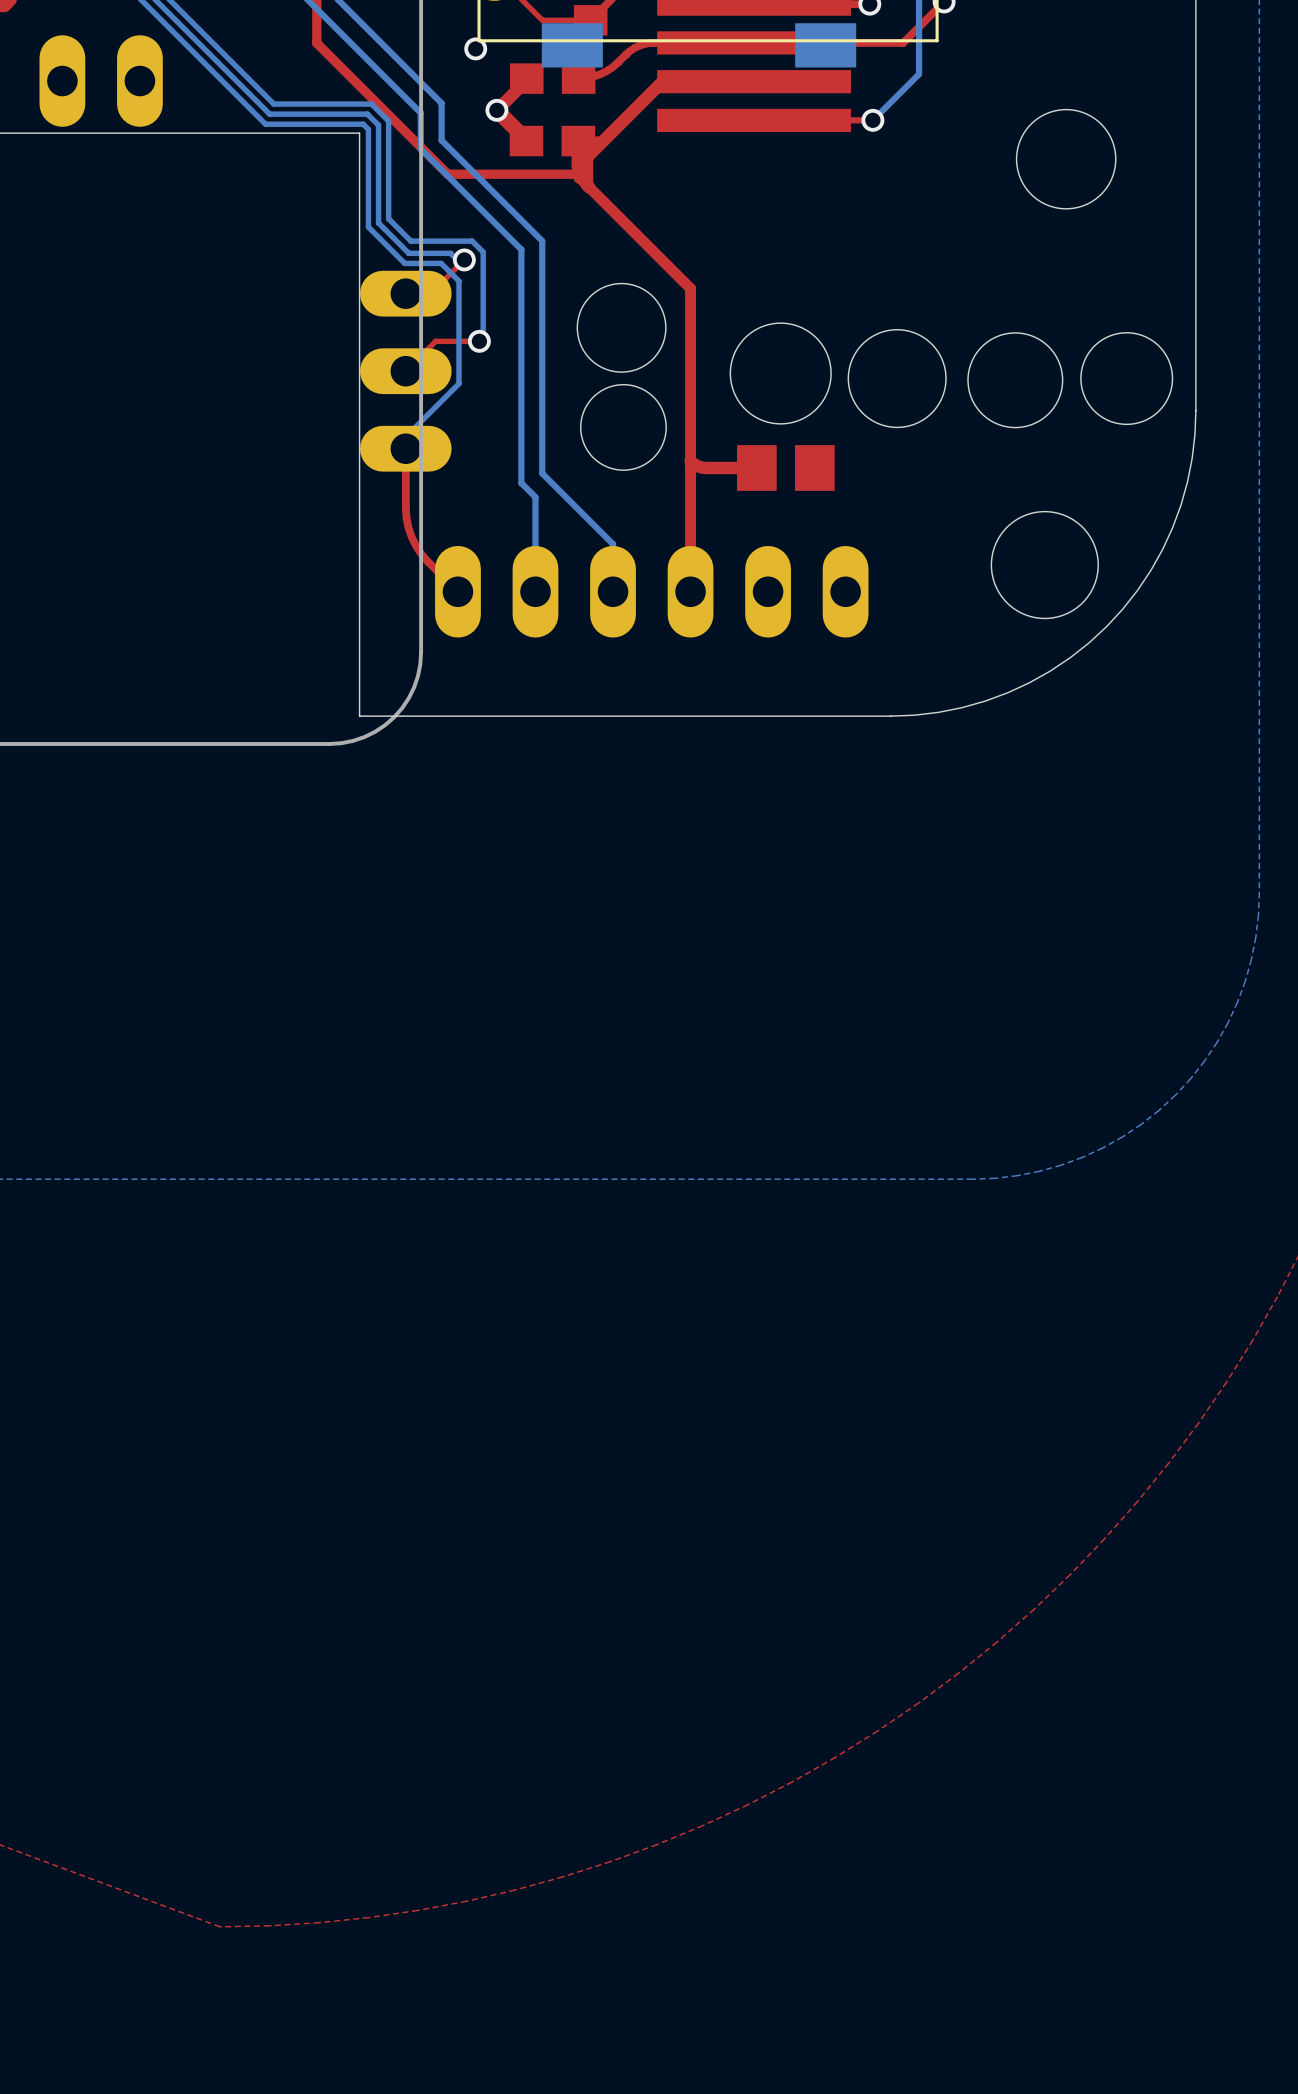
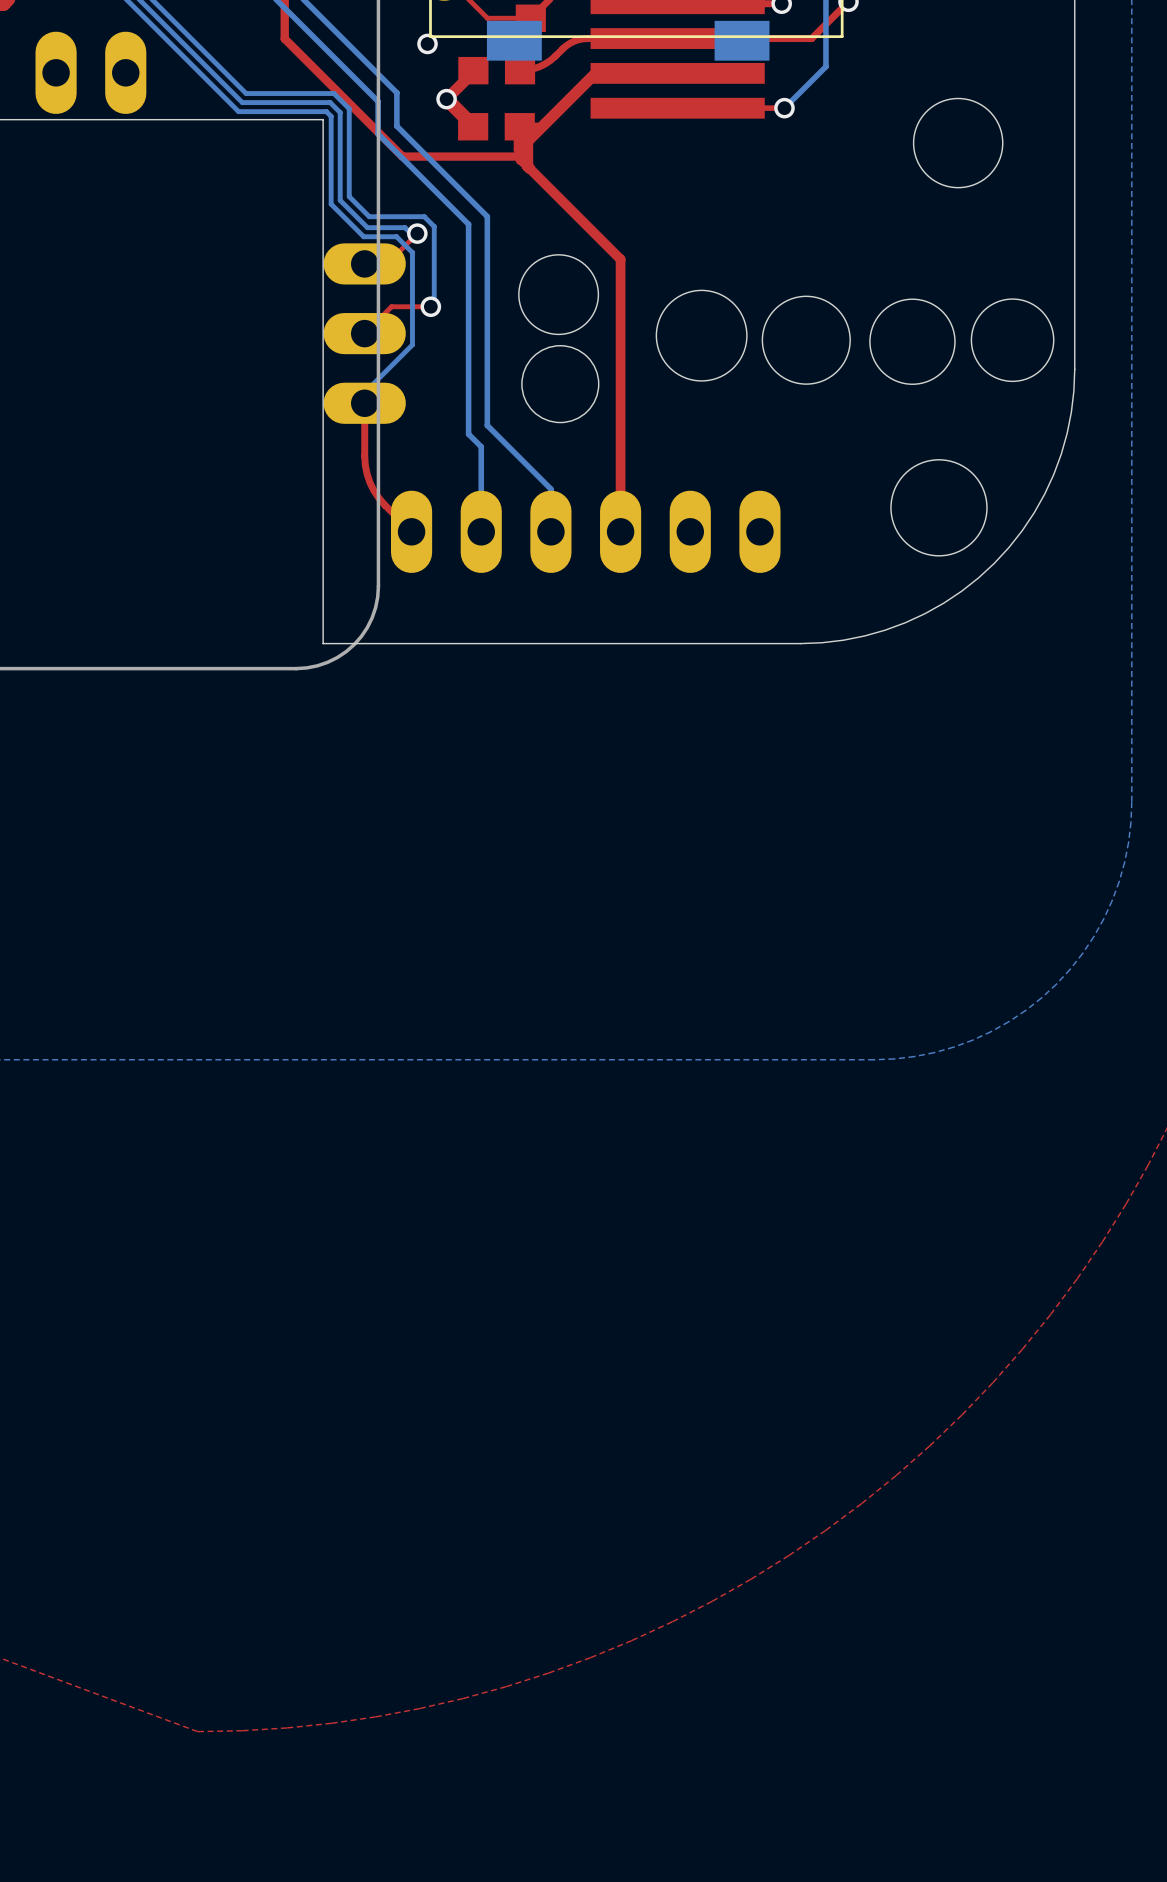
top track: (690, 461) (703, 467) (756, 467) -> none
part: (785, 467) -> none

